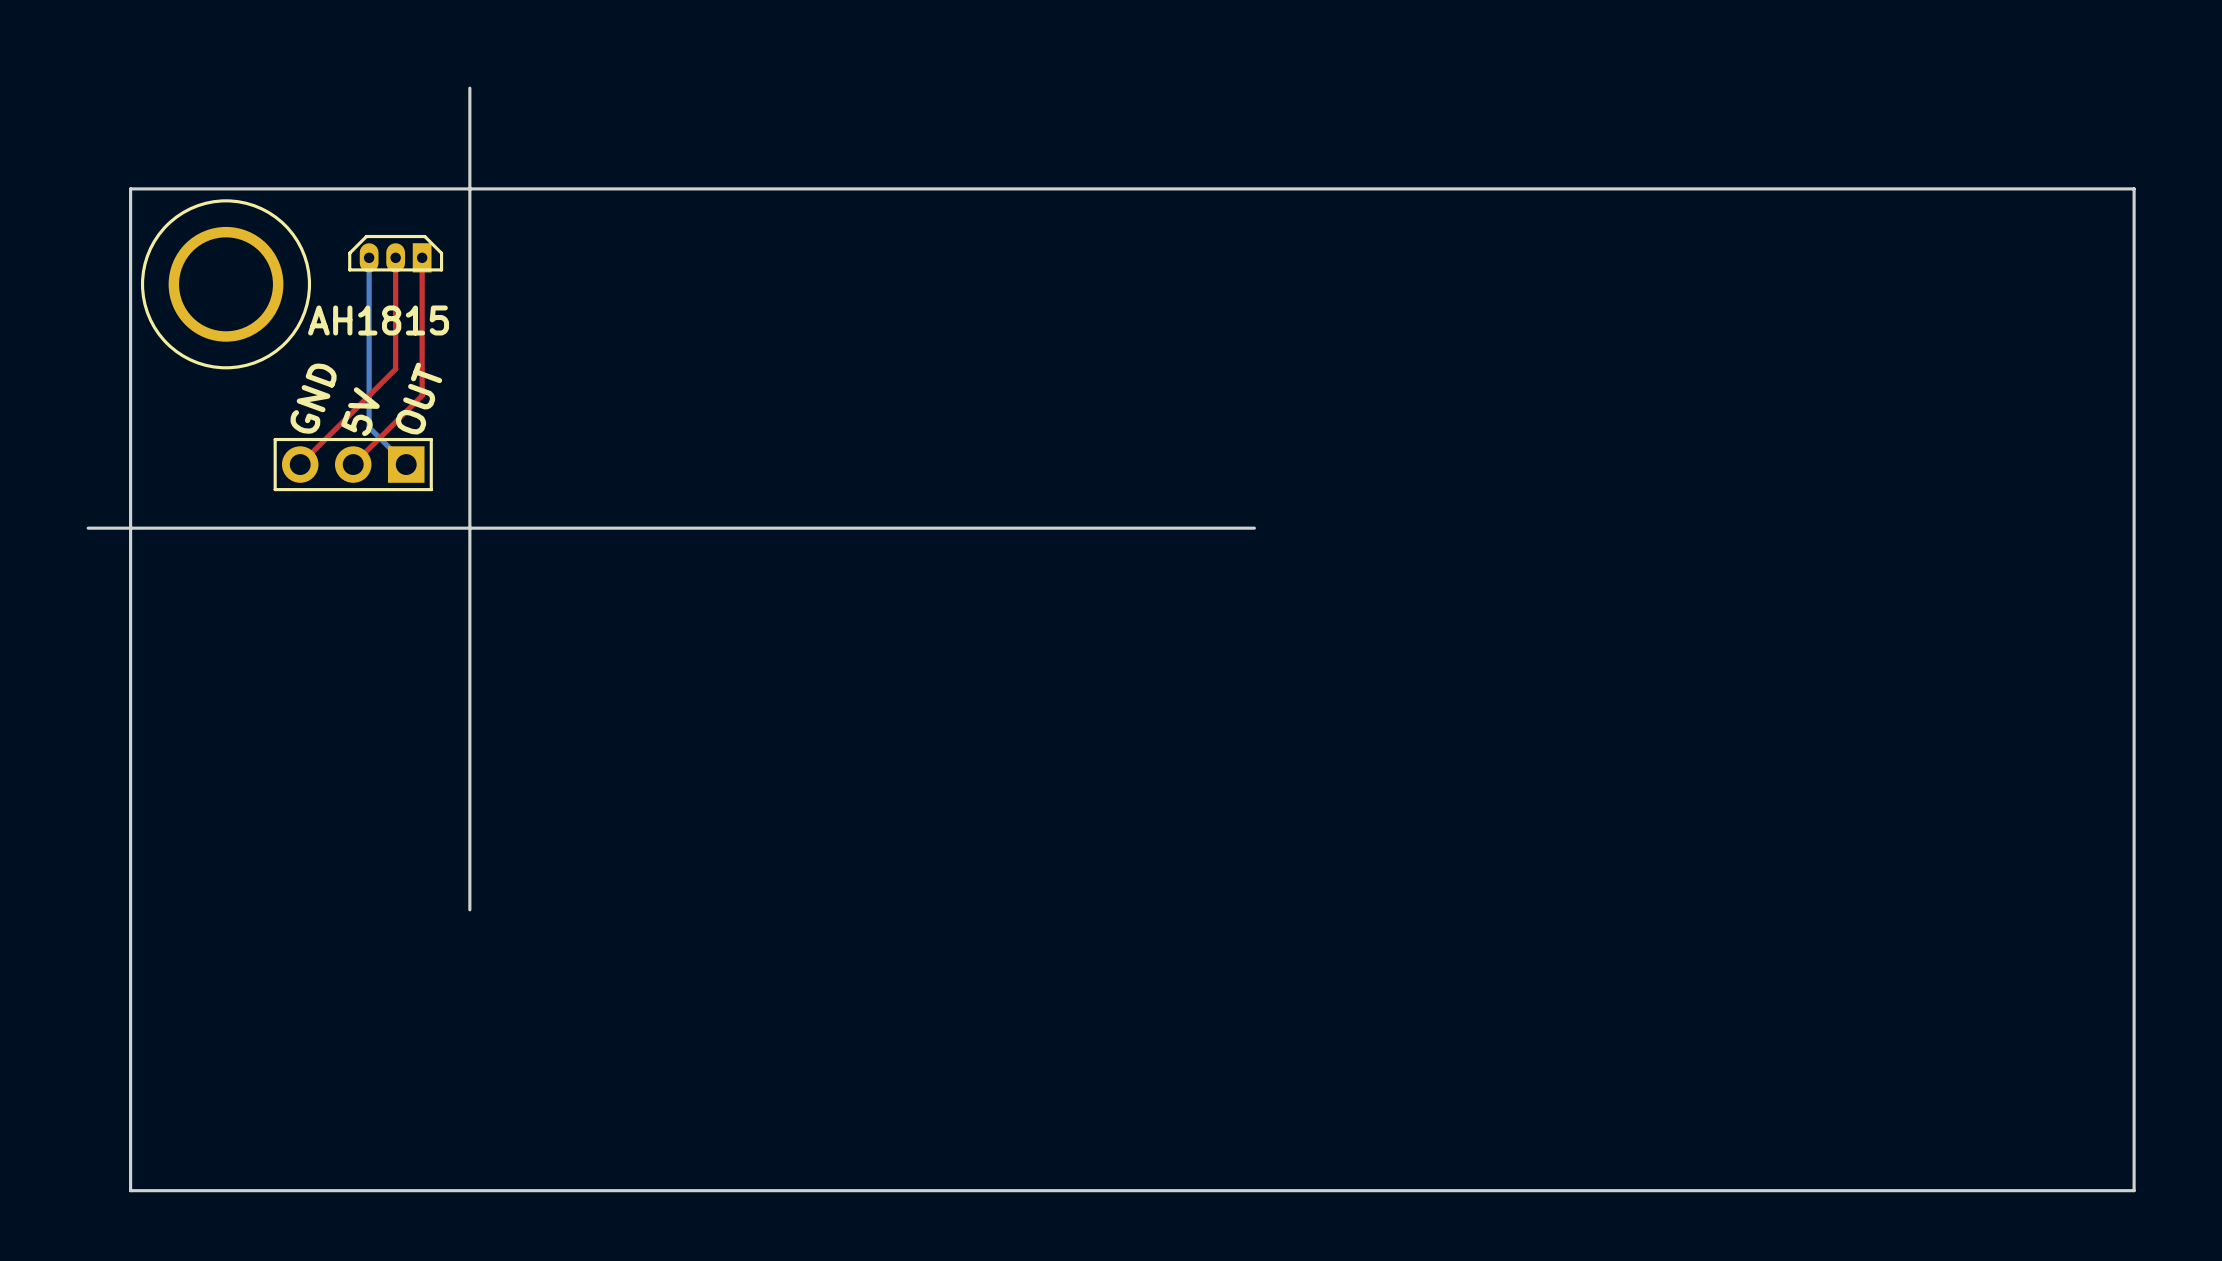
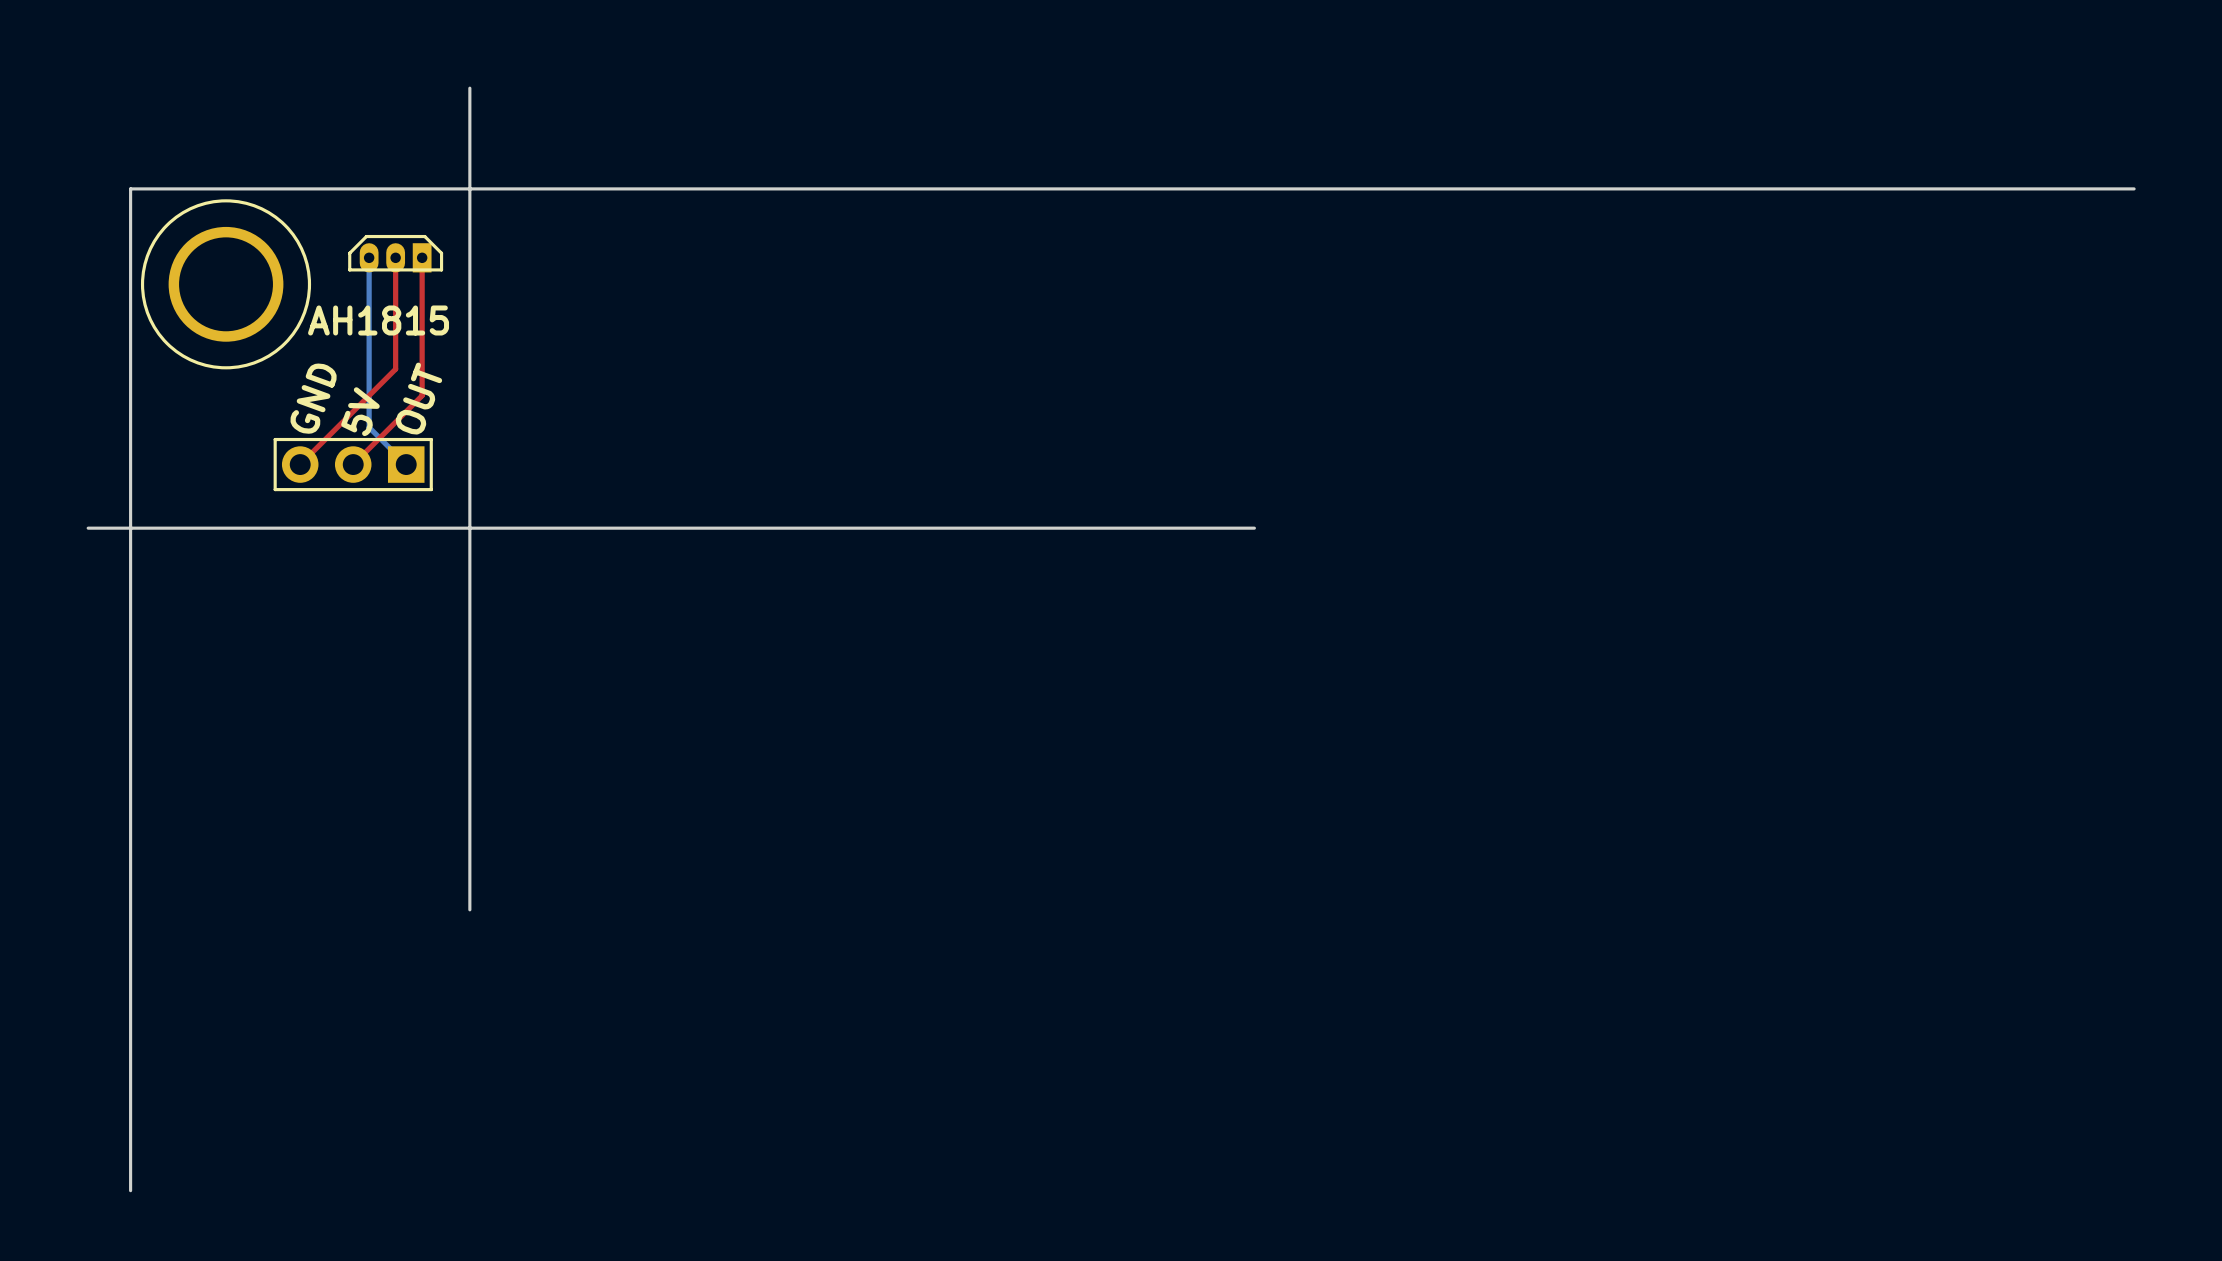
board edge: (2134, 188) (2134, 1190) (130, 1190) -> none

